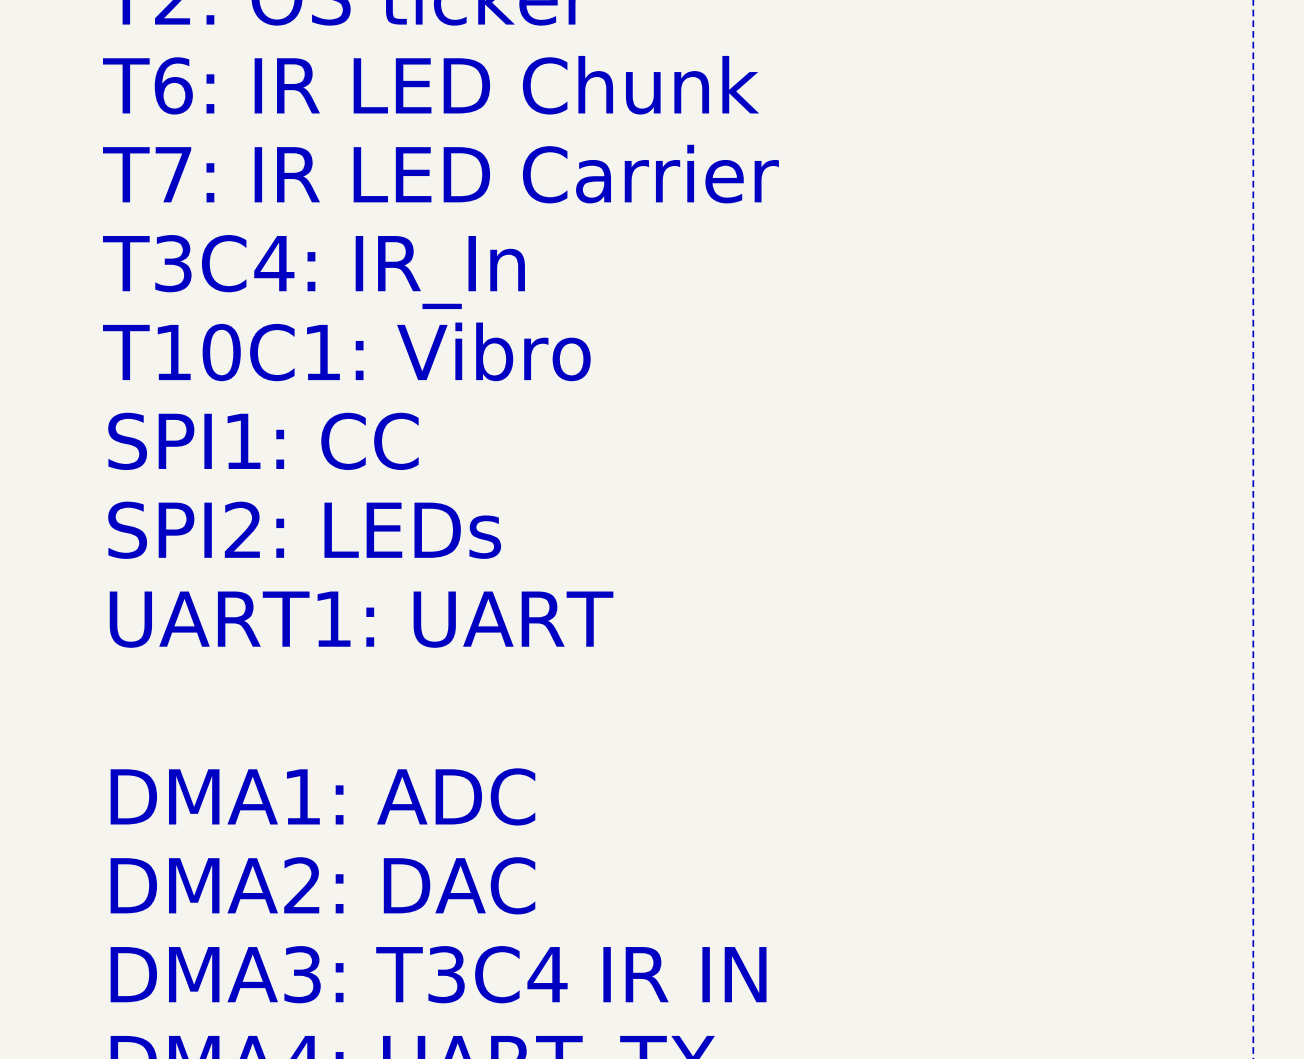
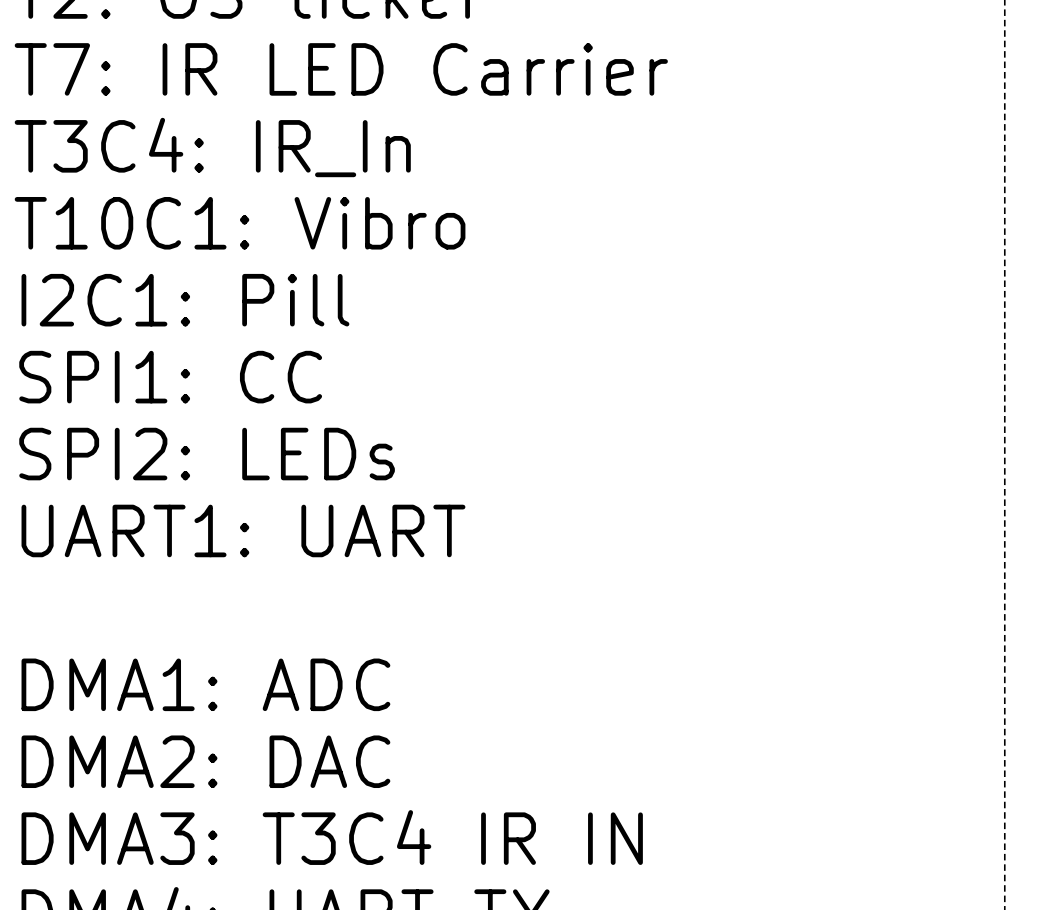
text: T6: IR LED Chunk (431, 85) -> T7: IR LED Carrier (341, 69)
text: T7: IR LED Carrier (440, 174) -> T3C4: IR_In (212, 147)
text: T3C4: IR_In (313, 272) -> T10C1: Vibro (240, 223)
text: T10C1: Vibro (346, 351) -> I2C1: Pill (185, 300)

